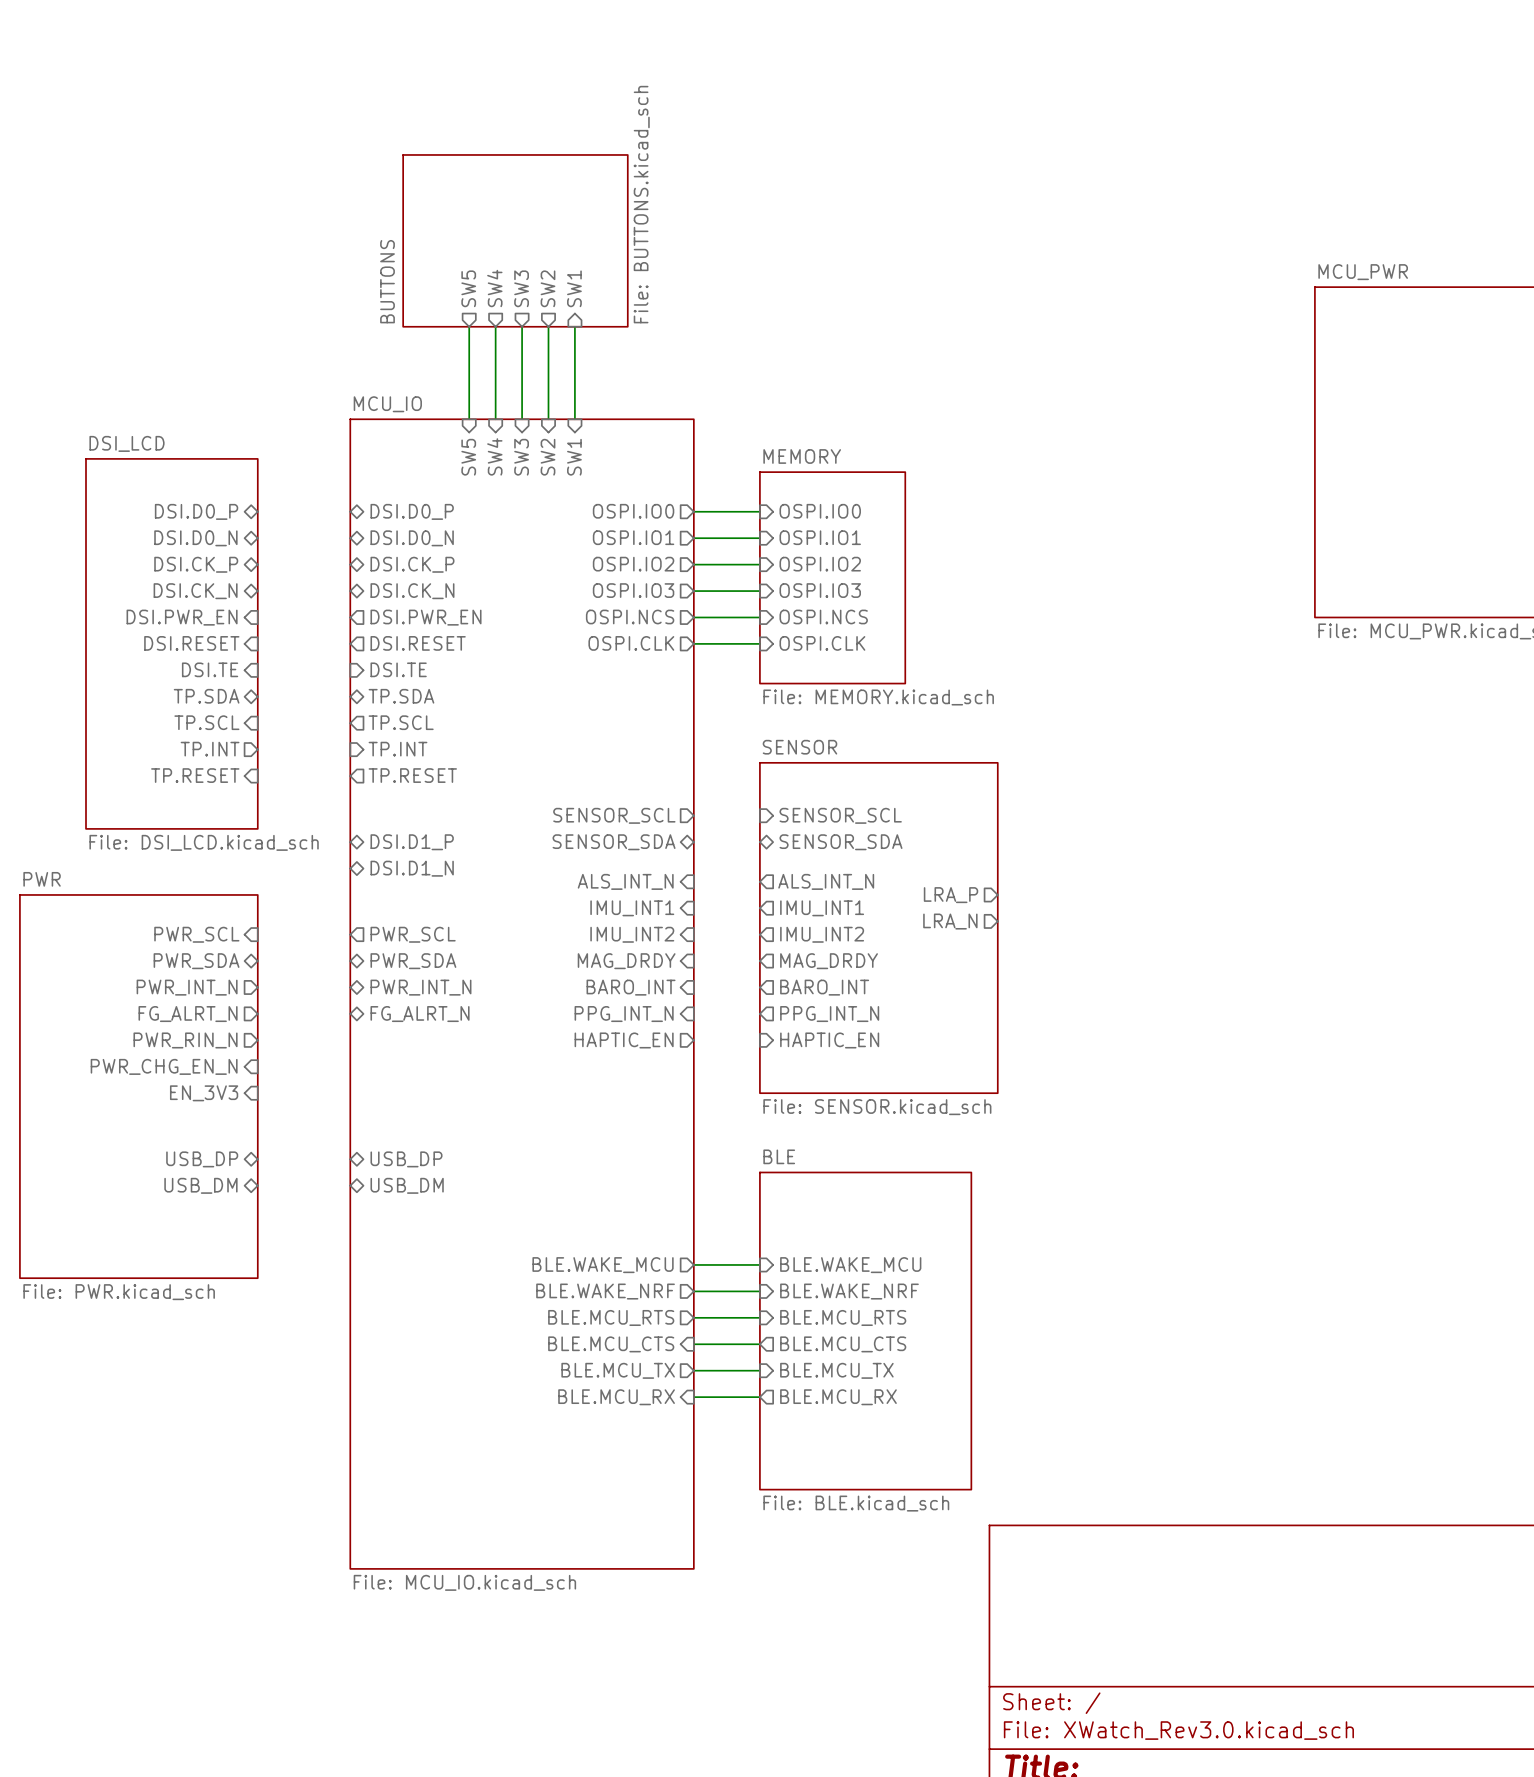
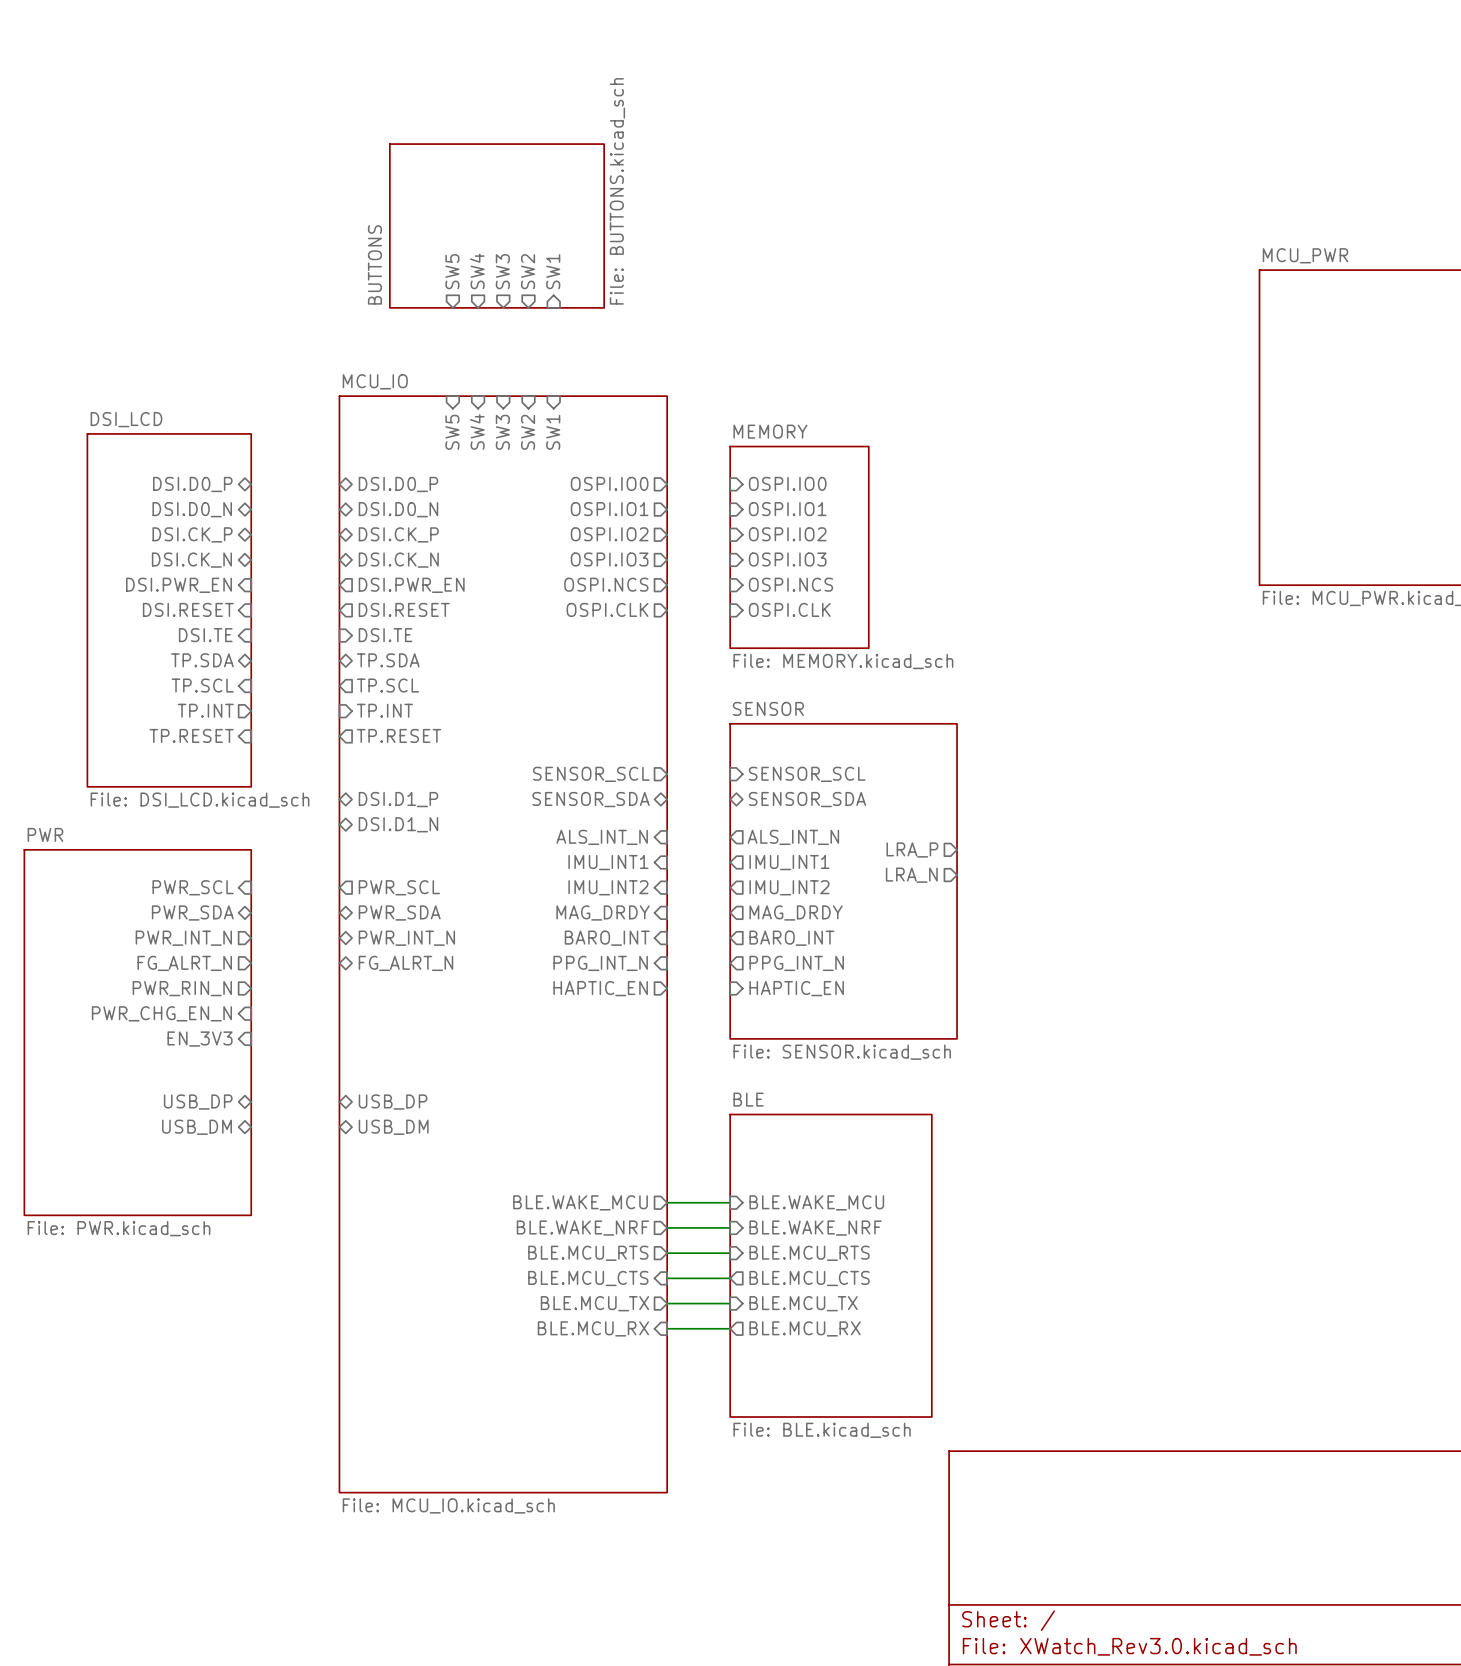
wire: (469, 326) (469, 419) -> none
wire: (495, 326) (495, 419) -> none
wire: (522, 326) (522, 419) -> none
wire: (548, 326) (548, 419) -> none
wire: (574, 326) (574, 419) -> none
wire: (693, 511) (759, 511) -> none
wire: (693, 538) (759, 538) -> none
wire: (693, 564) (759, 564) -> none
wire: (693, 591) (759, 591) -> none
wire: (693, 617) (759, 617) -> none
wire: (693, 643) (759, 643) -> none

